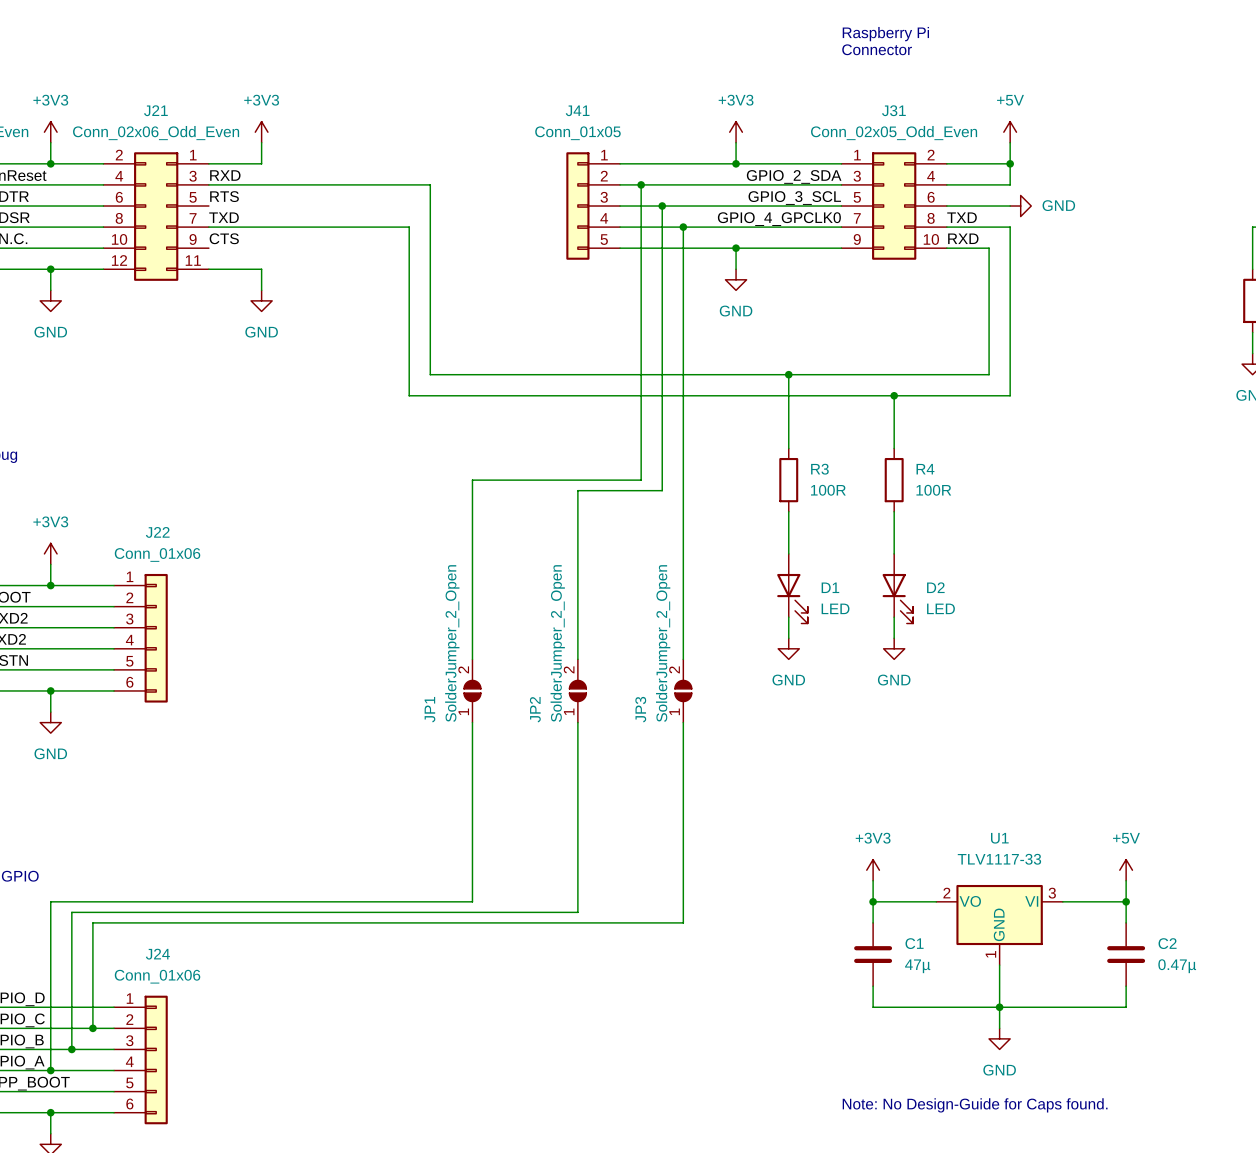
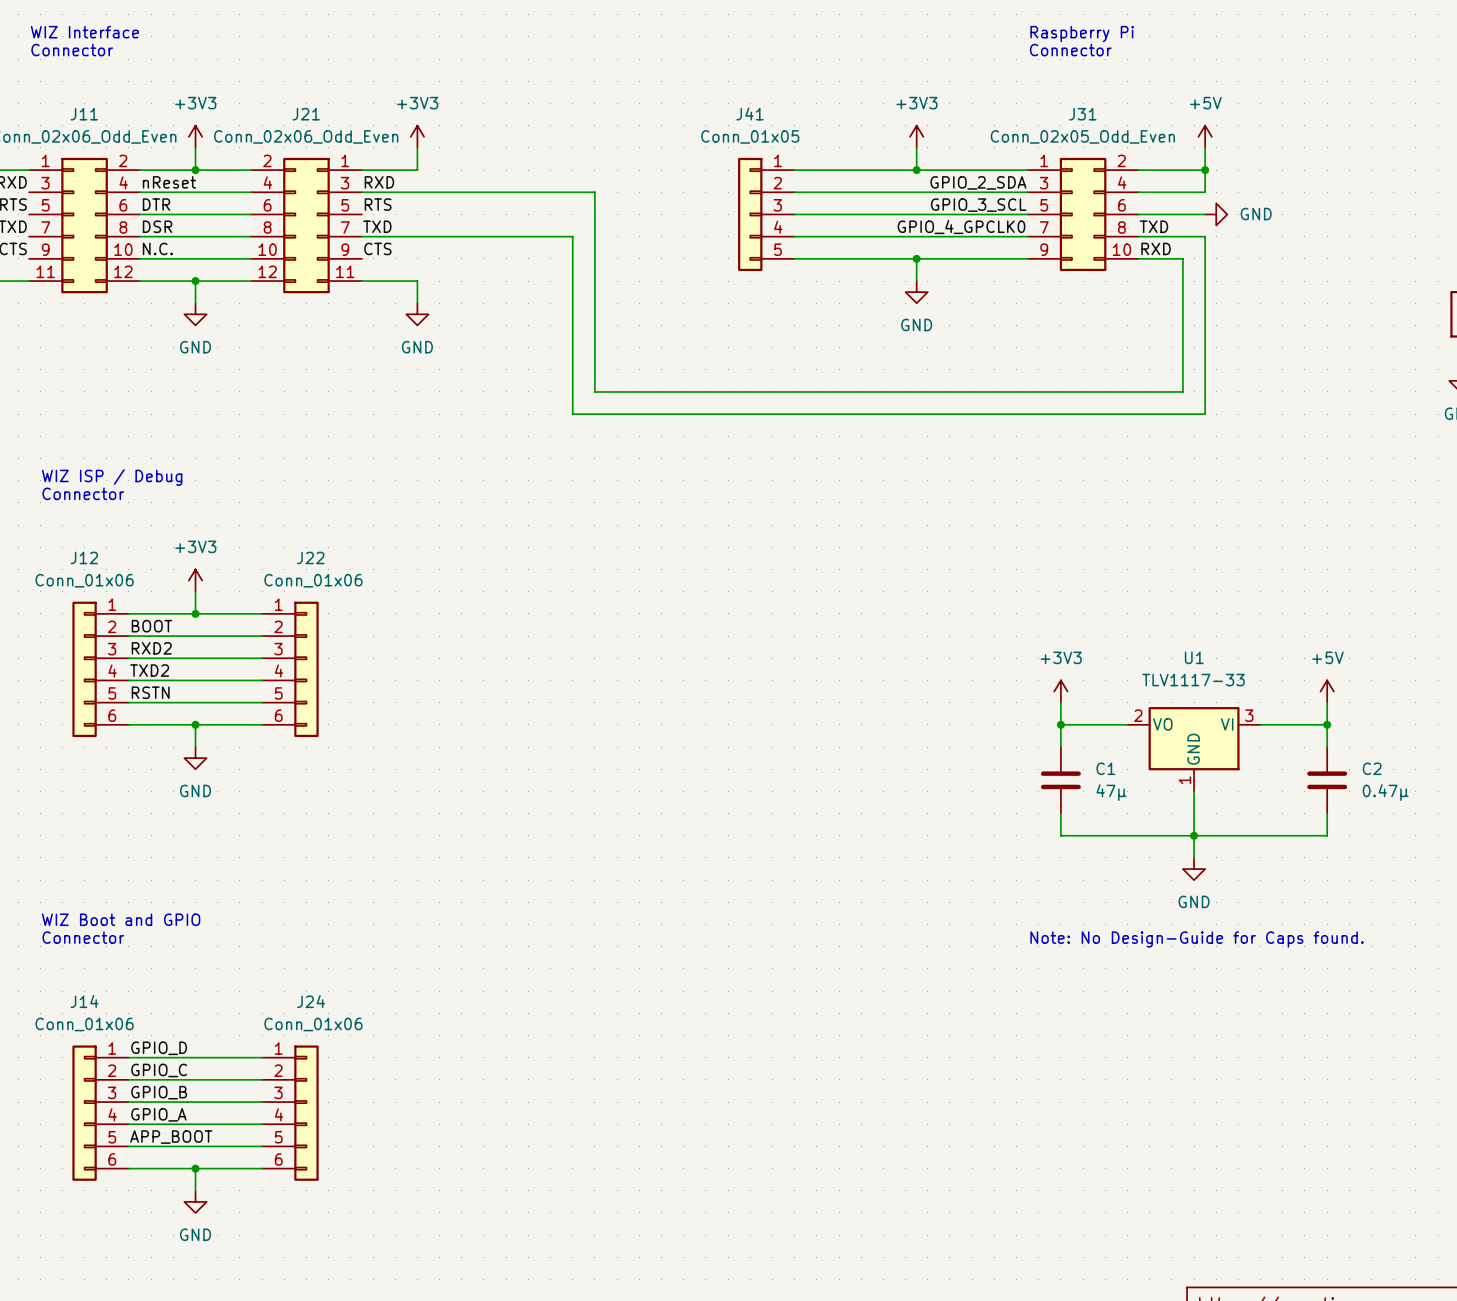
wire: (641, 184) (641, 480) (472, 480) (472, 659) -> none
junction: (641, 184) -> none
wire: (662, 206) (662, 490) (577, 490) (577, 659) -> none
junction: (662, 206) -> none
wire: (683, 227) (683, 659) -> none
junction: (683, 227) -> none
wire: (788, 374) (788, 448) -> none
junction: (788, 374) -> none
wire: (894, 395) (894, 448) -> none
junction: (894, 395) -> none
R3: 100R (788, 480) -> none
R4: 100R (894, 480) -> none
wire: (788, 511) (788, 553) -> none
wire: (894, 511) (894, 553) -> (1060, 702) (1060, 747)
D1: LED (792, 588) -> none
D2: LED (897, 588) -> none
wire: (788, 617) (788, 638) -> none
wire: (894, 617) (894, 638) -> none
power symbol: GND (788, 648) -> none
power symbol: GND (894, 648) -> none
power symbol: none -> +3V3 (1060, 691)
power symbol: none -> +5V (1327, 691)
wire: none -> (1327, 702) (1327, 747)
JP1: SolderJumper_2_Open (472, 690) -> none
JP2: SolderJumper_2_Open (577, 690) -> none
JP3: SolderJumper_2_Open (683, 690) -> none
wire: none -> (1060, 724) (1127, 724)
junction: none -> (1060, 724)
wire: none -> (1260, 724) (1327, 724)
junction: none -> (1327, 724)
wire: (472, 722) (472, 901) (50, 901) (50, 1070) -> none
wire: (577, 722) (577, 912) (71, 912) (71, 1049) -> none
wire: (683, 722) (683, 922) (92, 922) (92, 1028) -> none
wire: none -> (1194, 791) (1194, 857)
wire: none -> (1060, 813) (1060, 835) (1327, 835) (1327, 813)
junction: none -> (1194, 835)
power symbol: none -> GND (1194, 869)
power symbol: +3V3 (873, 870) -> none
power symbol: +5V (1126, 870) -> none
wire: (873, 880) (873, 922) -> none
wire: (1126, 880) (1126, 922) -> none
text: none -> Note: No Design-Guide for Caps found. (1197, 939)
wire: (873, 901) (936, 901) -> none
junction: (873, 901) -> none
wire: (1062, 901) (1126, 901) -> none
junction: (1126, 901) -> none
U1 position: (999, 925) -> (1194, 749)
C1 position: (873, 954) -> (1060, 780)
C2 position: (1126, 954) -> (1327, 780)
wire: (999, 965) (999, 1028) -> none
wire: (873, 986) (873, 1007) (1126, 1007) (1126, 986) -> none
junction: (999, 1007) -> none
junction: (92, 1028) -> none
power symbol: GND (999, 1038) -> none
junction: (71, 1049) -> none
junction: (50, 1070) -> none
text: Note: No Design-Guide for Caps found. (975, 1105) -> none

